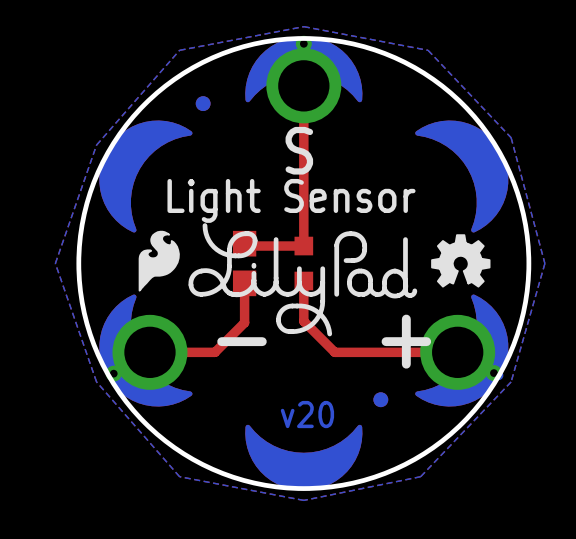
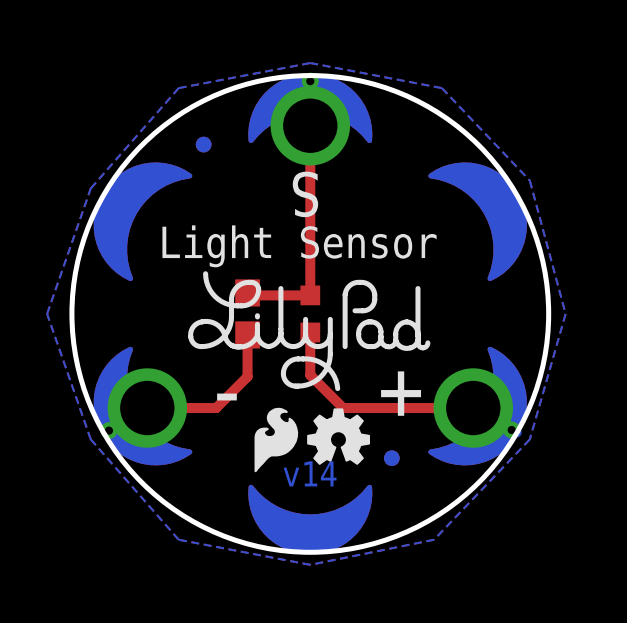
drawing position: (460, 260) -> (338, 436)
drawing position: (159, 261) -> (276, 440)
text: v20 (307, 414) -> v14 (310, 473)

